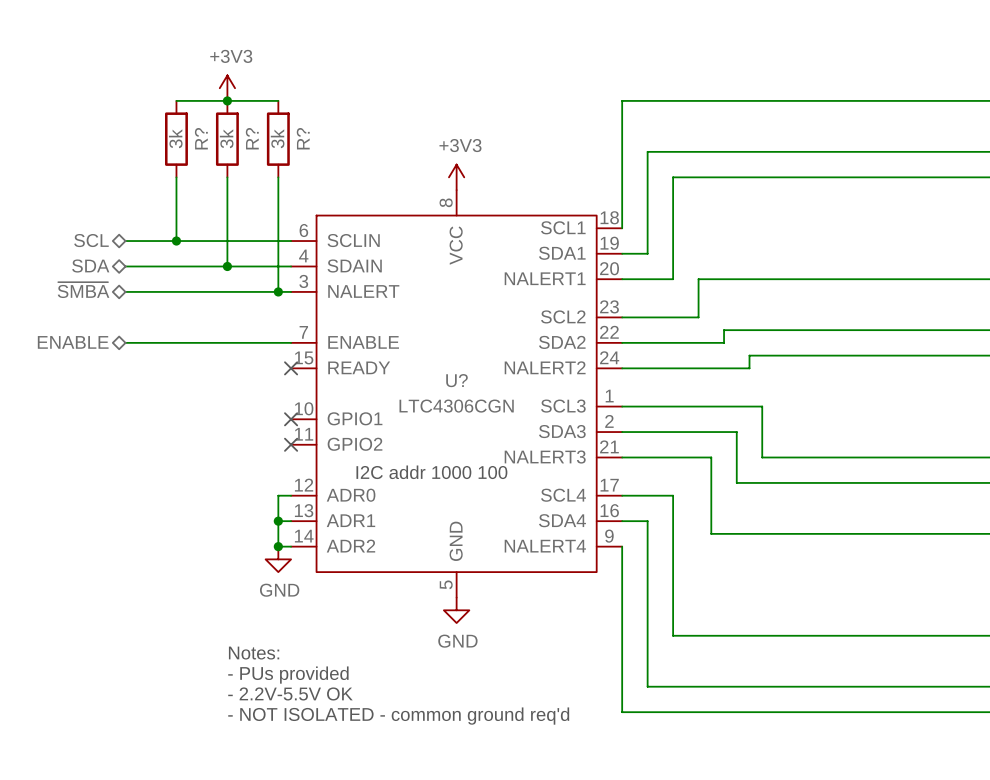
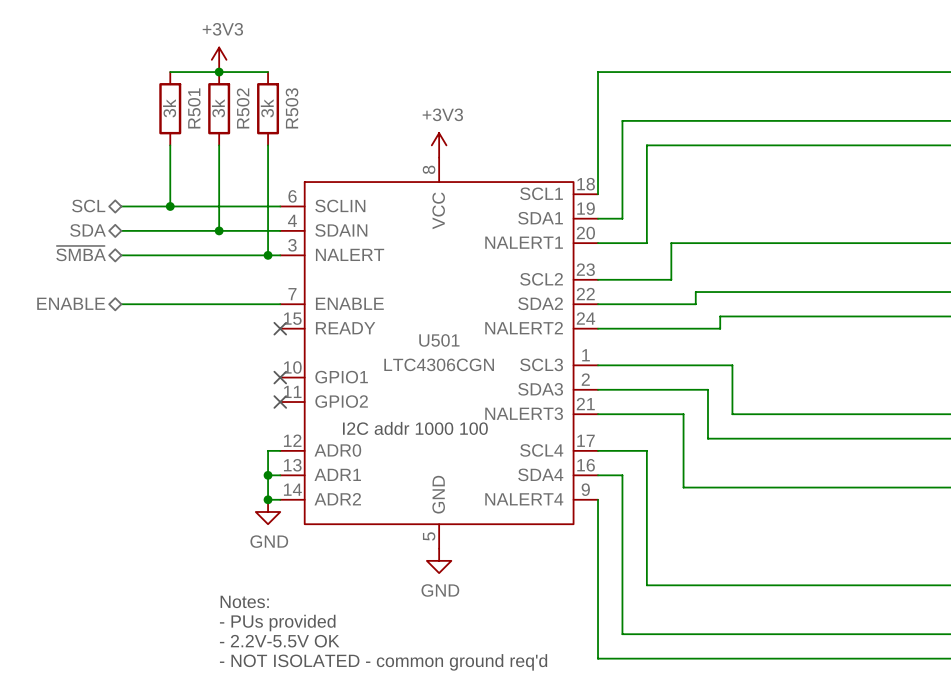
R? name: R? (201, 138) -> R501 (194, 108)
R? name: R? (252, 138) -> R502 (243, 108)
R? name: R? (303, 138) -> R503 (292, 108)
U? name: U? (456, 380) -> U501 (439, 340)

